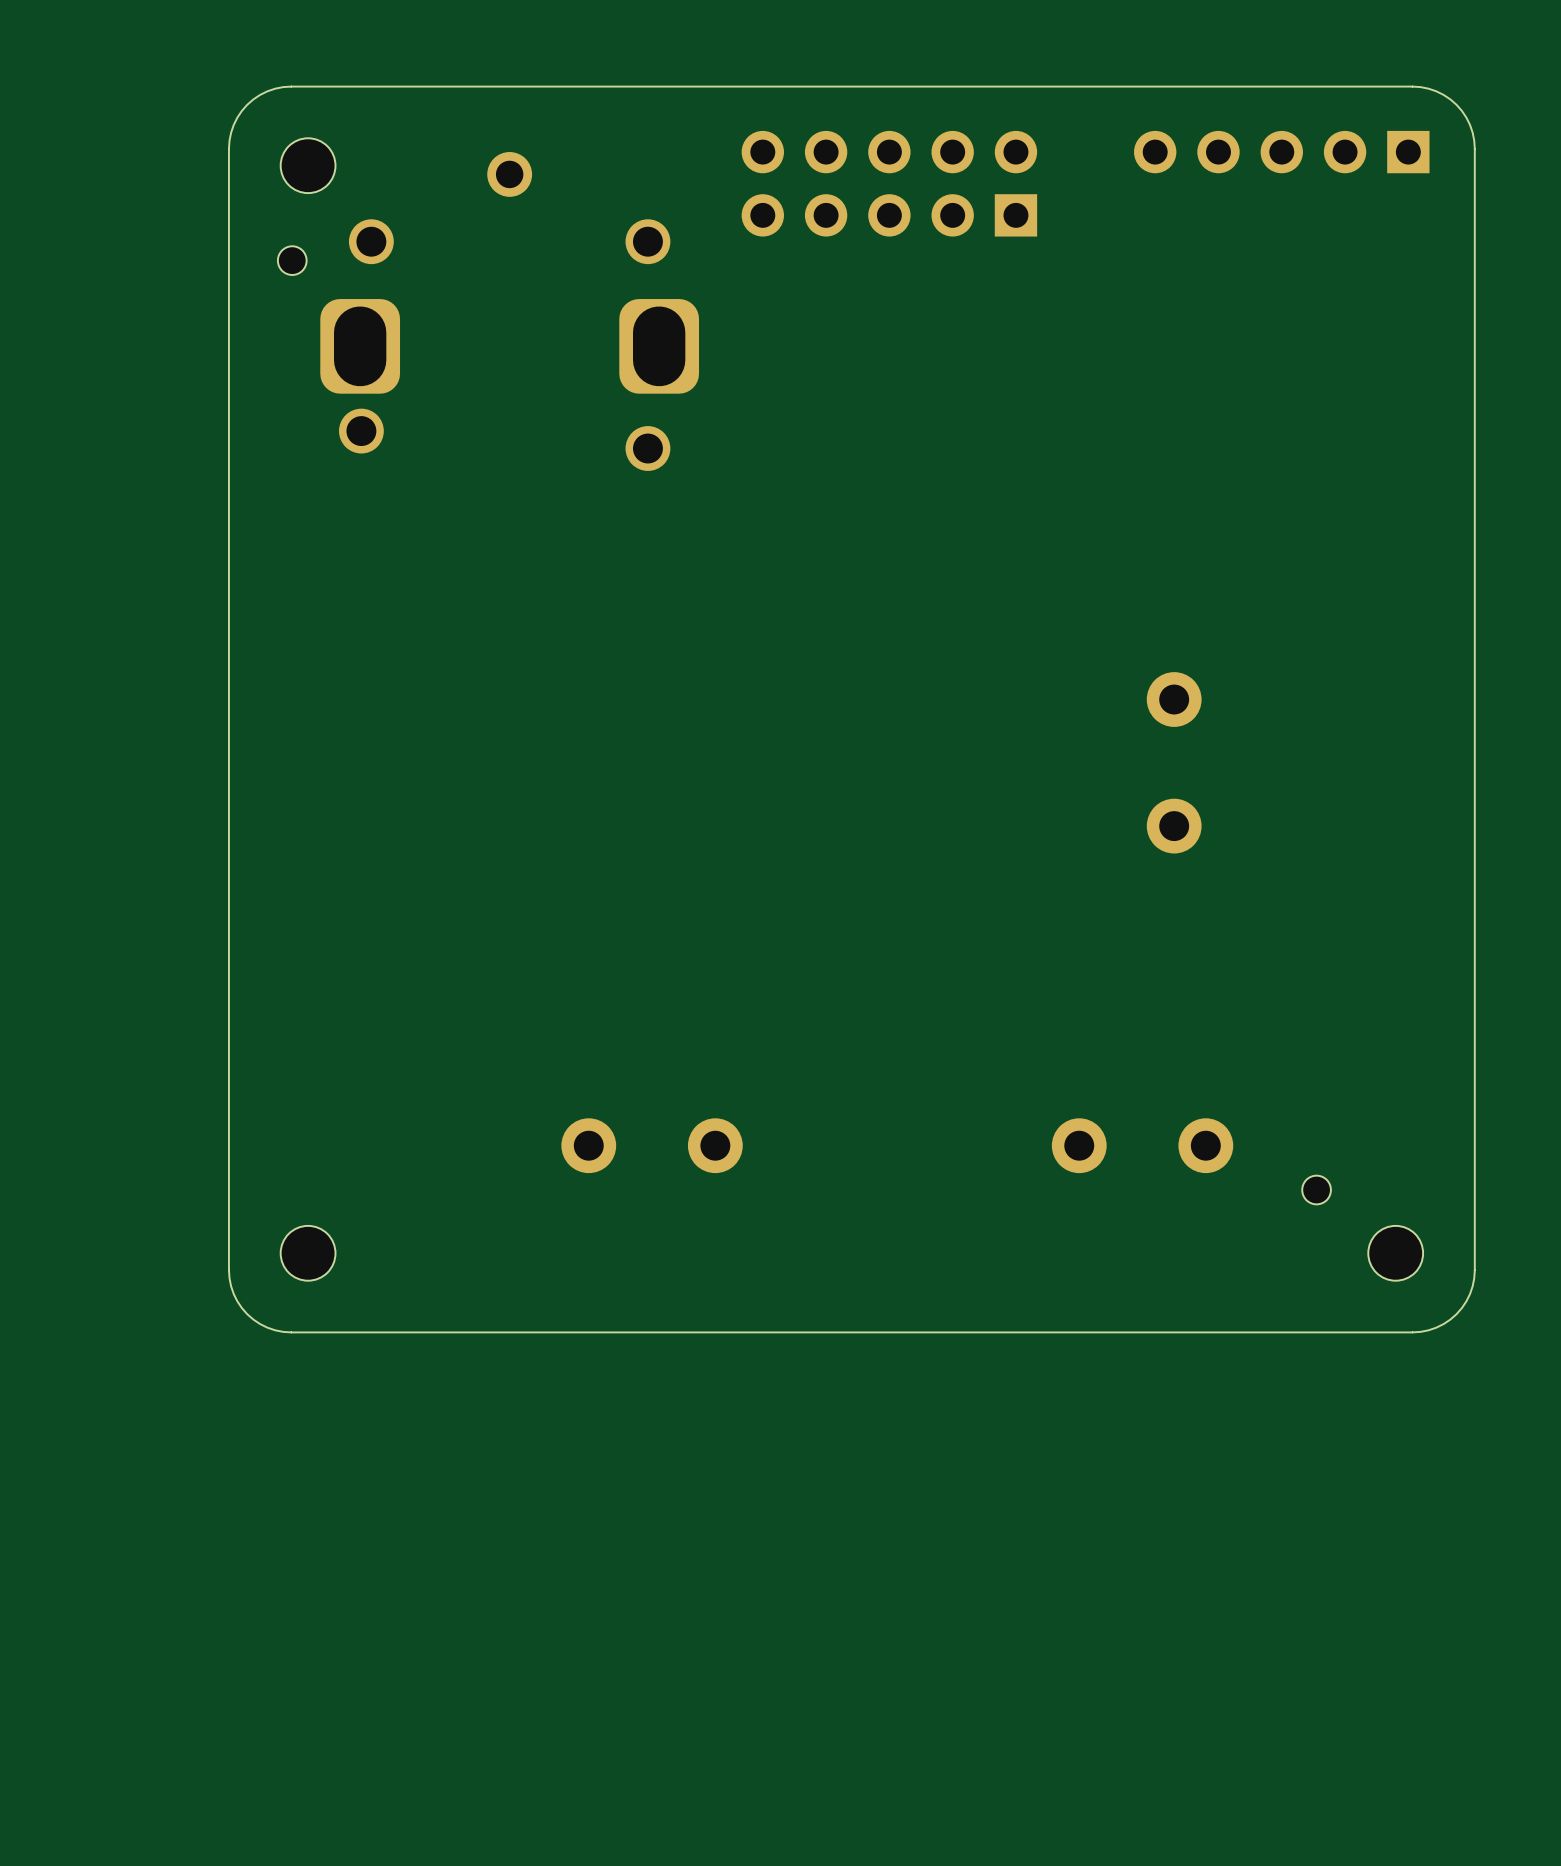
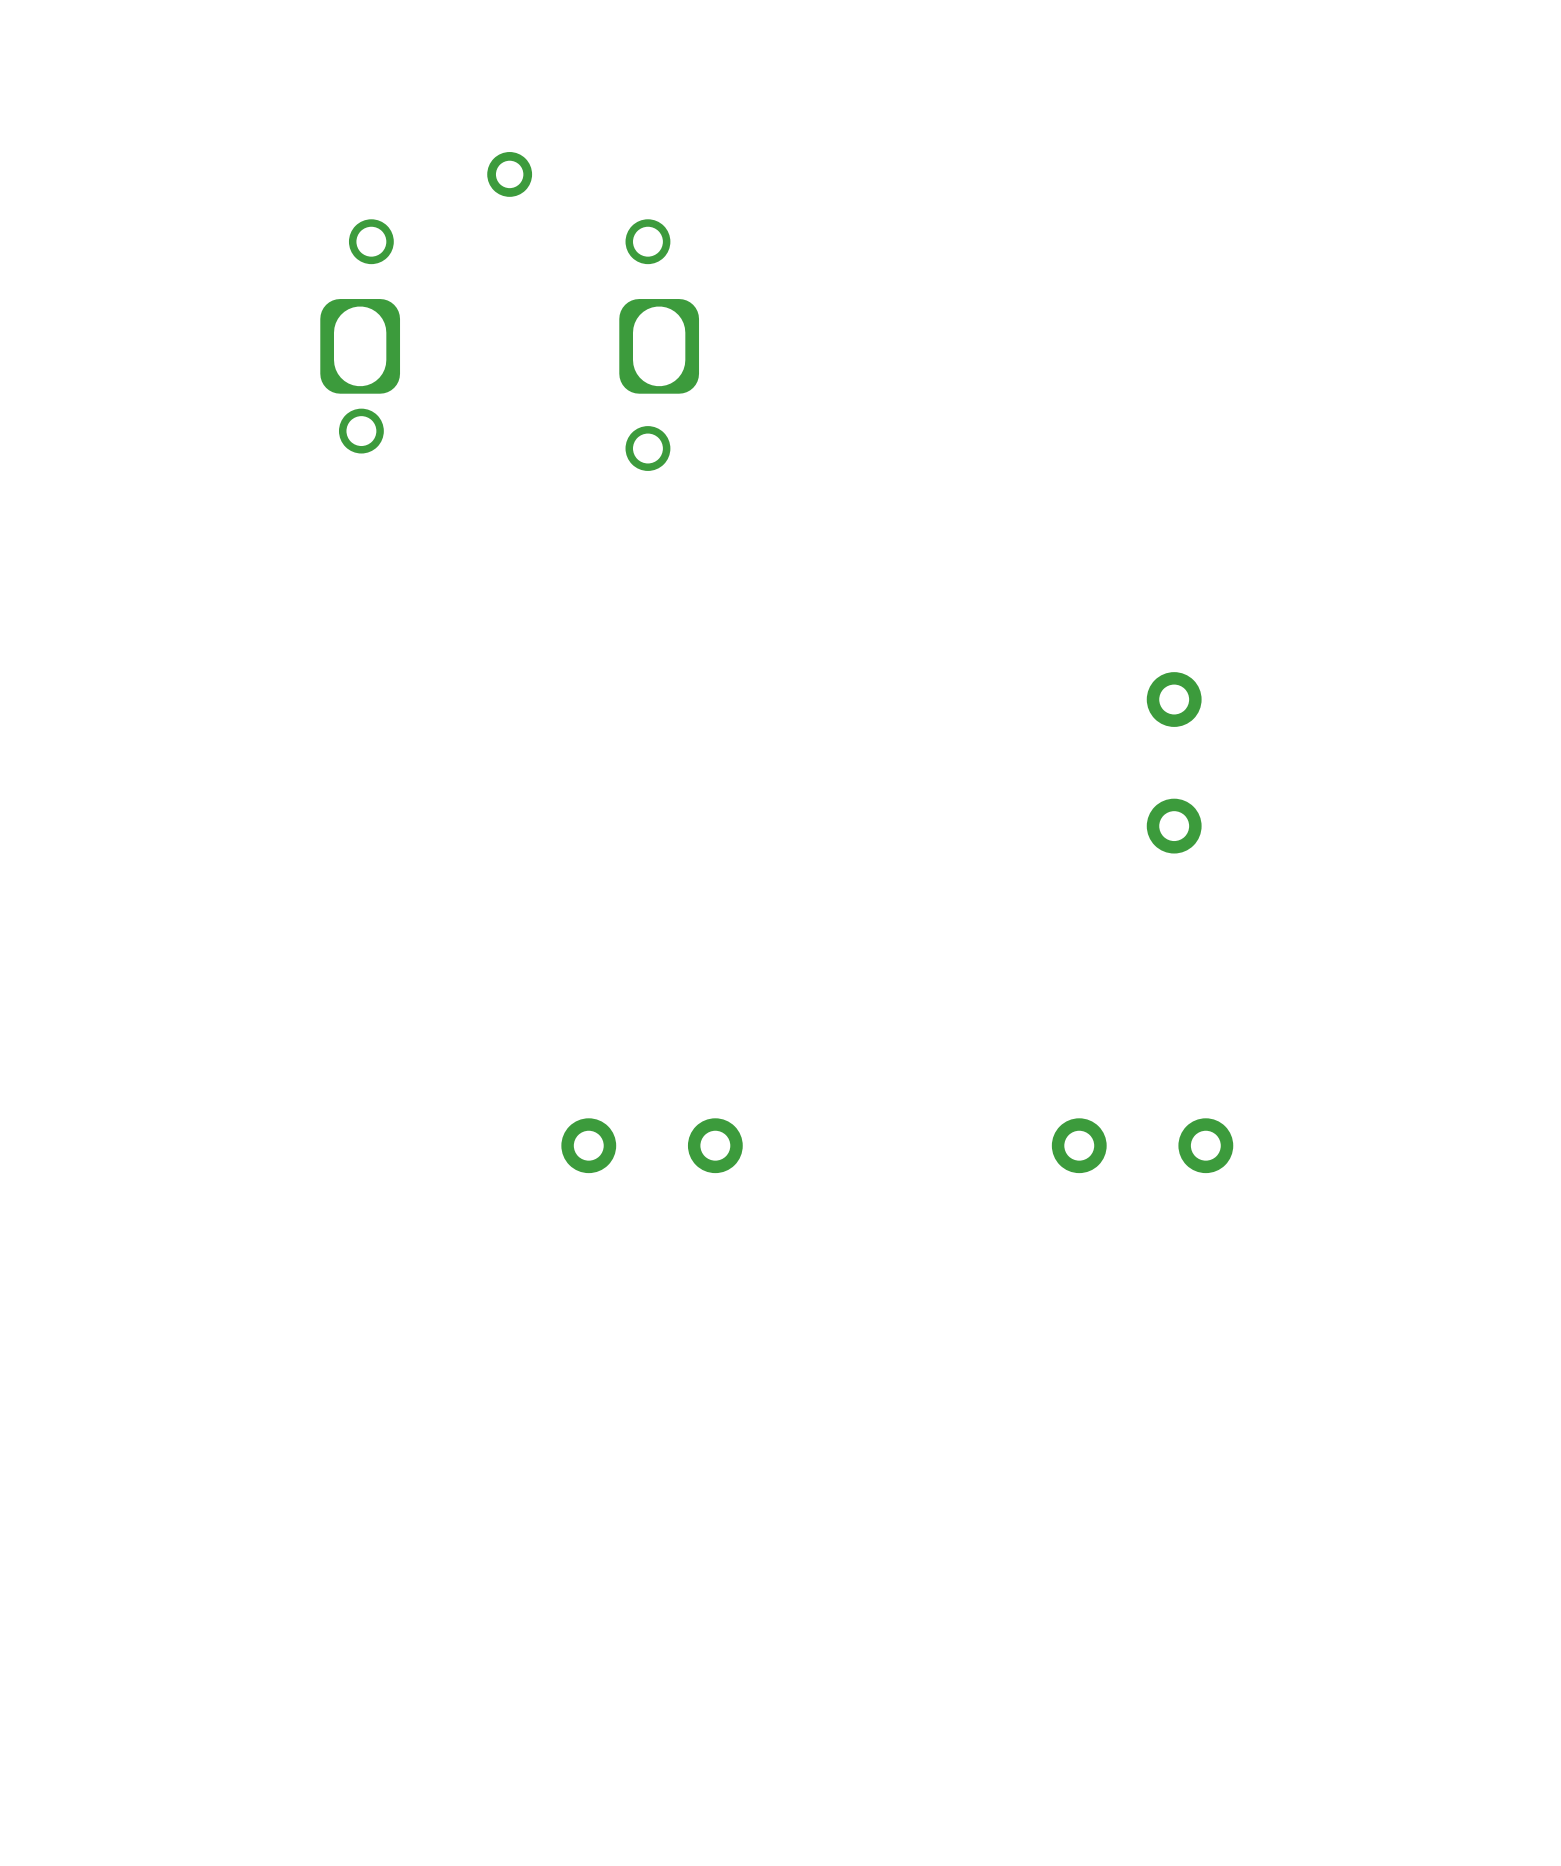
board edge: (1412, 86) (291, 86) (267, 91) (247, 104) (233, 125) (228, 148) (228, 1270) (233, 1293) (247, 1314) (267, 1327) (291, 1332) (1412, 1332) (1436, 1327) (1456, 1314) (1470, 1293) (1474, 1270) (1474, 148) (1470, 125) (1456, 104) (1436, 91) (1412, 86) -> none
part: (1281, 152) -> none
part: (308, 165) -> none
part: (889, 183) -> none
part: (292, 260) -> none
part: (1316, 1190) -> none
part: (308, 1253) -> none
part: (1395, 1253) -> none

